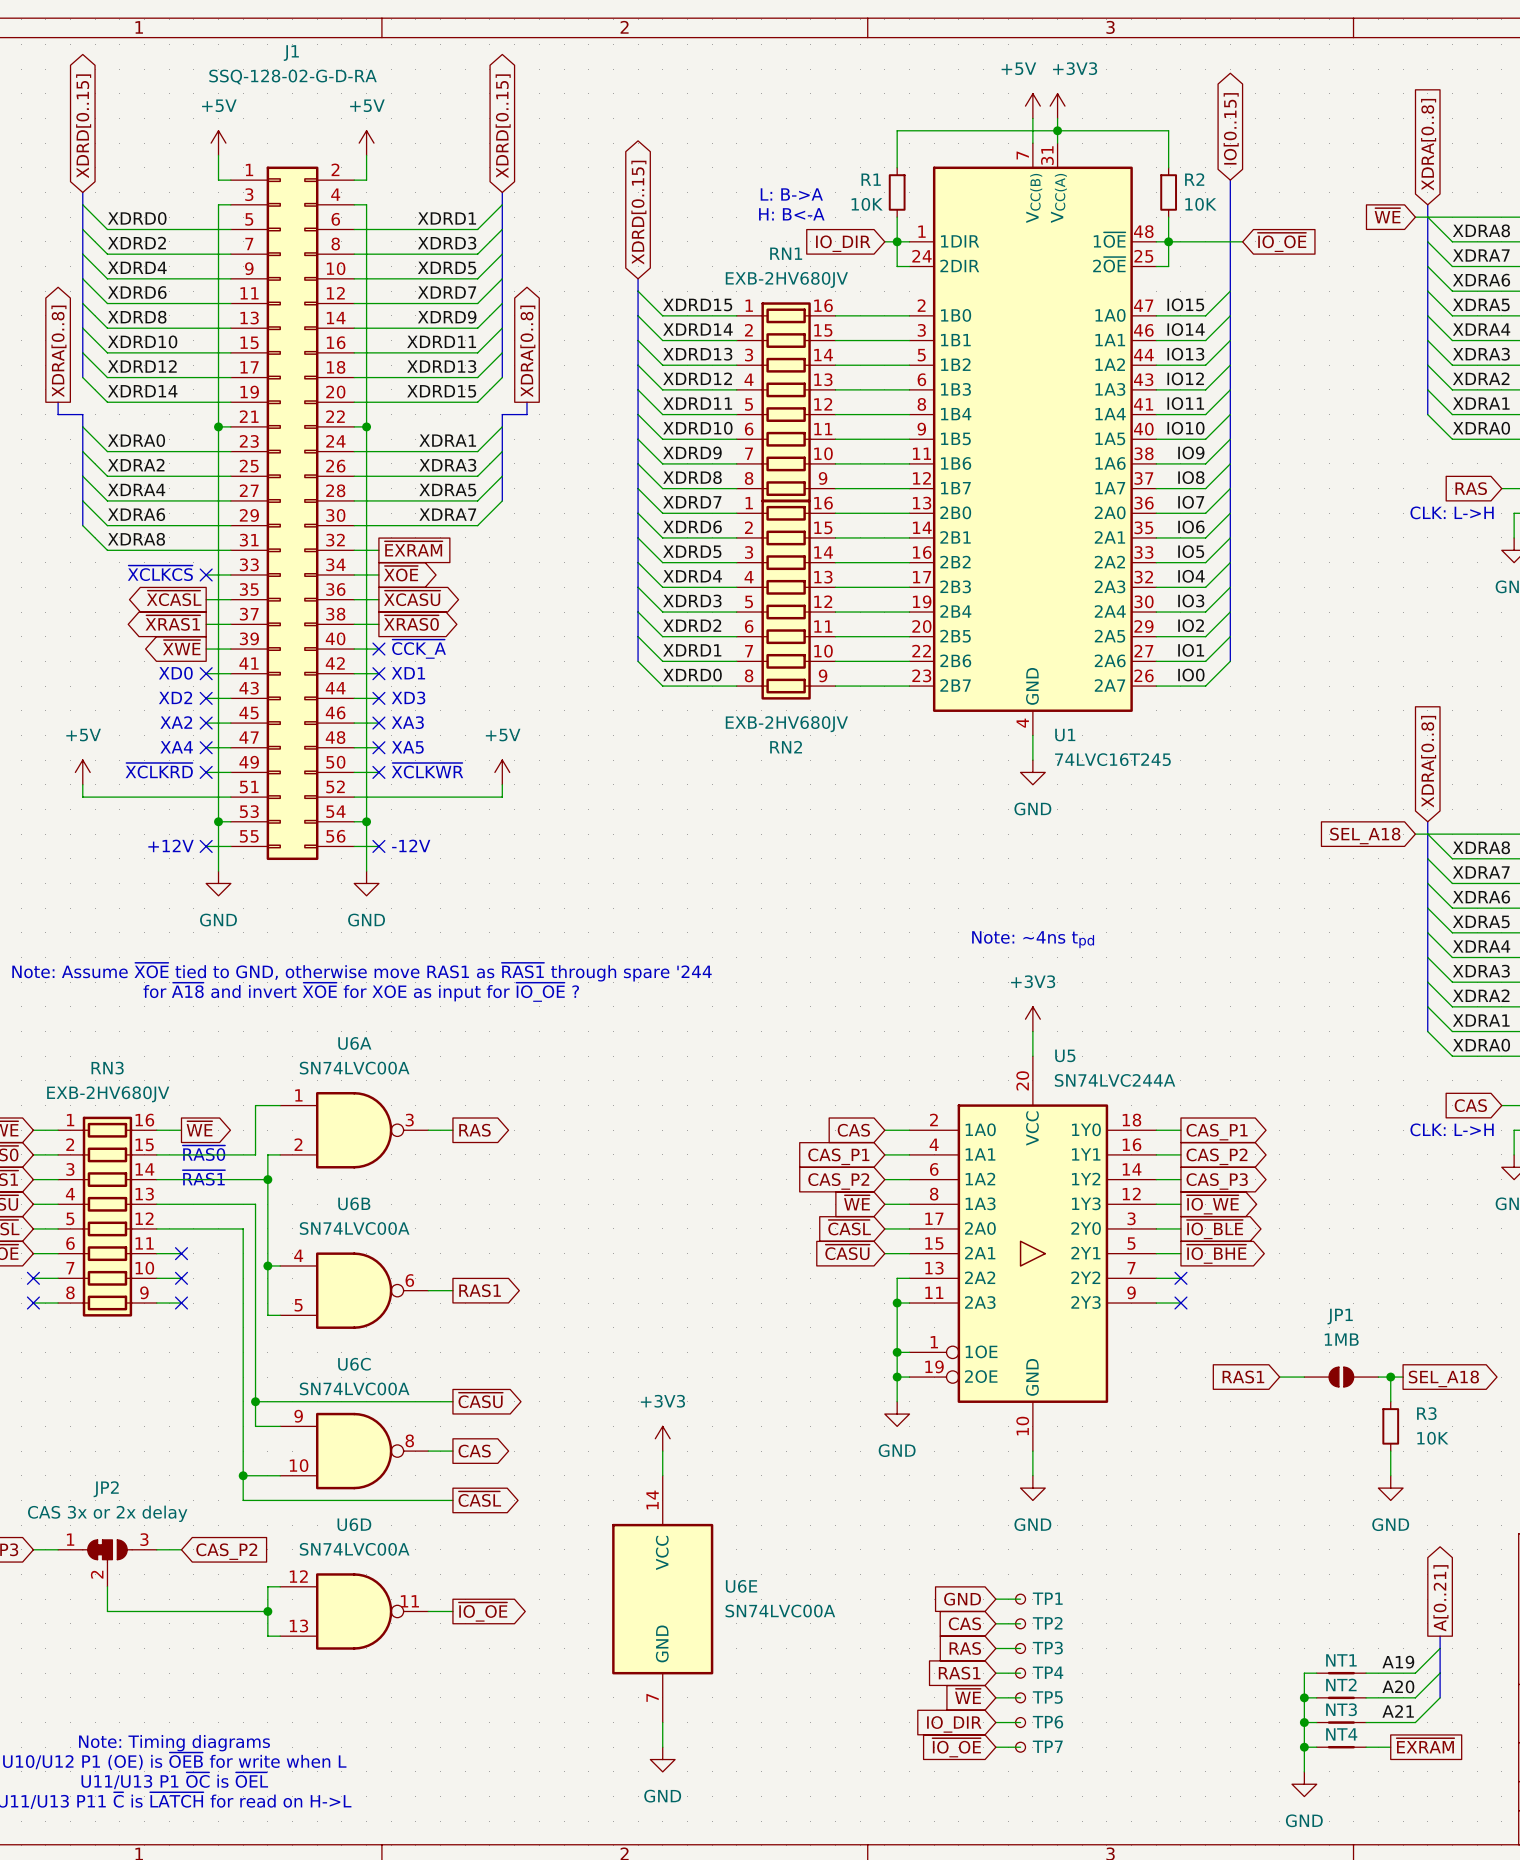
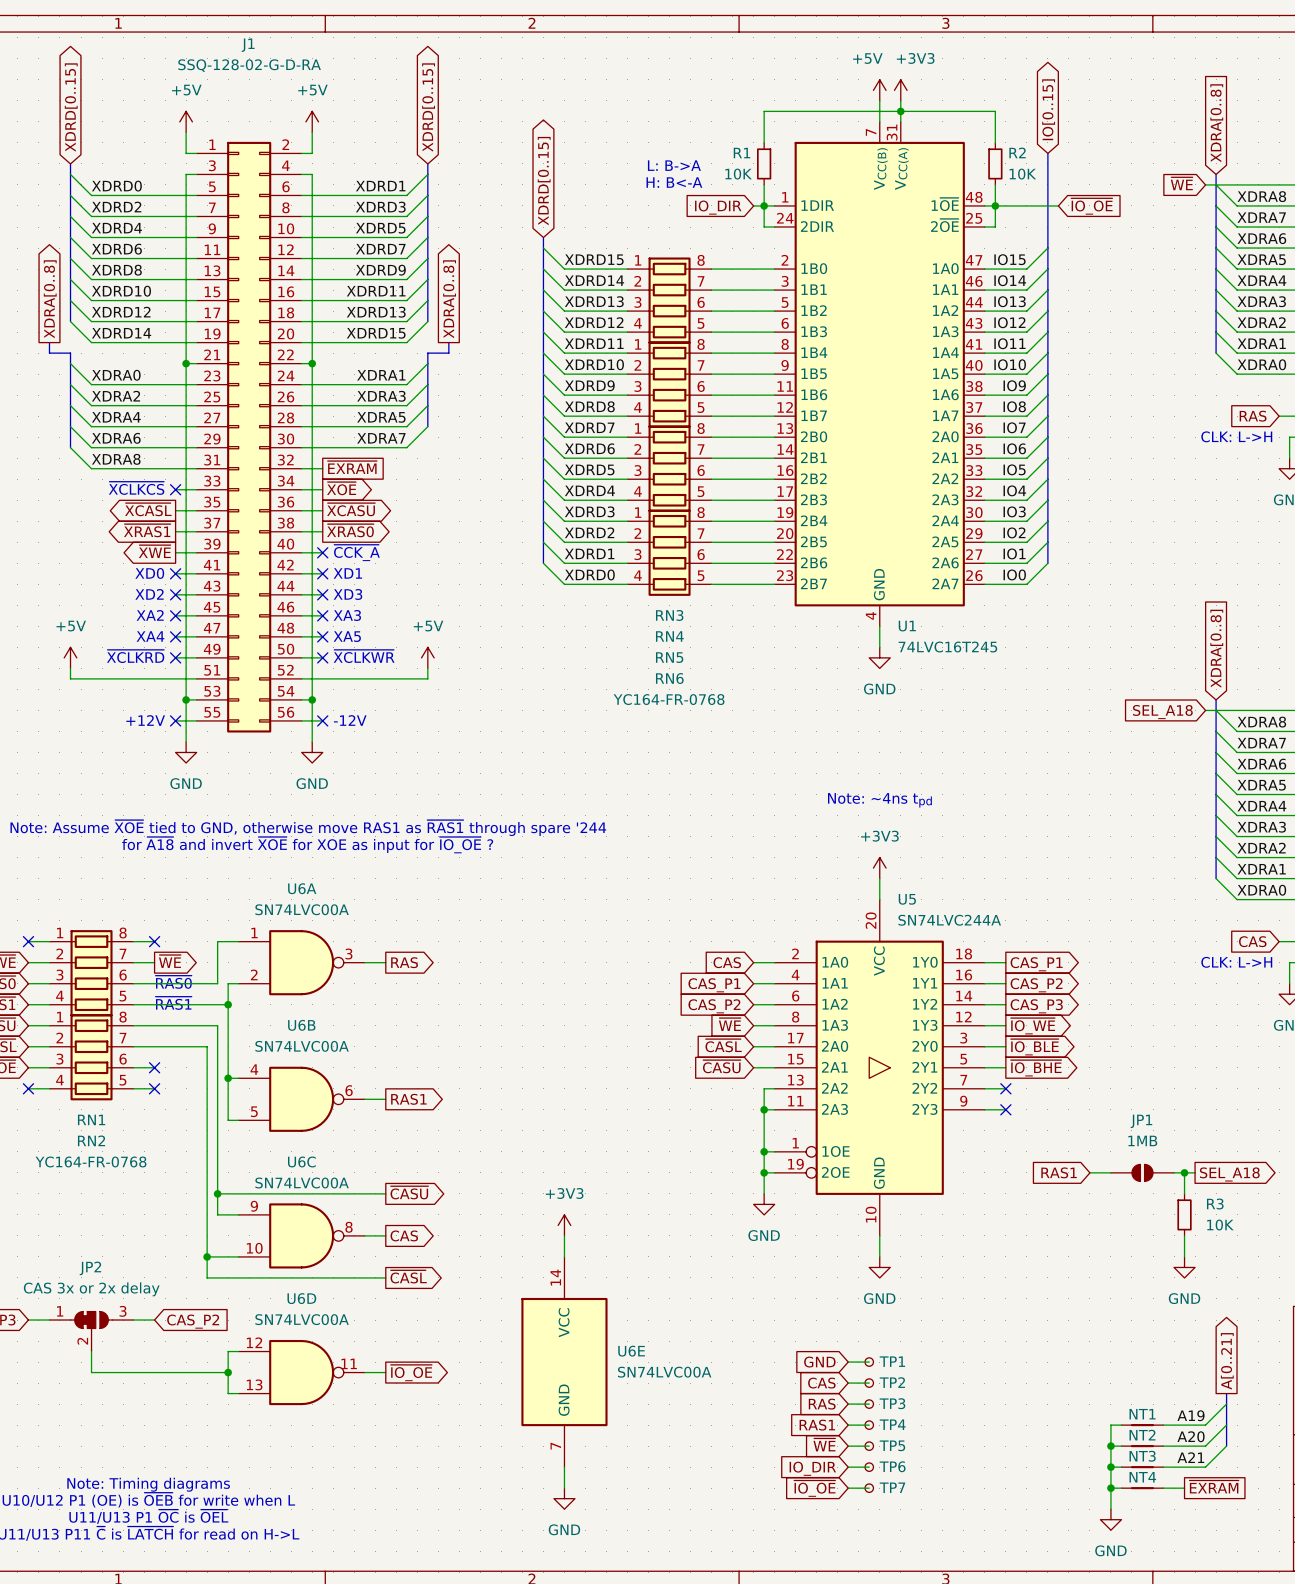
RN1 name position: RN1 (786, 253) -> RN1 (91, 1119)
RN1 value: EXB-2HV680JV (786, 279) -> none
RN1 symbol: [736, 302, 836, 503] -> [49, 930, 134, 1017]
RN4: none -> (669, 384)
RN2 symbol: [736, 499, 836, 700] -> [49, 1014, 134, 1101]
RN5: none -> (669, 468)
RN6: none -> (669, 552)
RN2 value: EXB-2HV680JV (786, 724) -> YC164-FR-0768 (91, 1161)
RN2 name position: RN2 (786, 747) -> RN2 (91, 1140)
RN3 name position: RN3 (107, 1068) -> RN3 (669, 615)
RN3 value: EXB-2HV680JV (108, 1094) -> YC164-FR-0768 (669, 699)
no-connect mark: none -> (28, 941)
no-connect mark: none -> (154, 941)
RN3 symbol: [58, 1116, 157, 1317] -> [627, 257, 712, 344]
wire: (33, 1303) (58, 1303) -> (28, 941) (49, 941)
no-connect mark: (33, 1303) -> none
wire: (156, 1303) (181, 1303) -> (133, 941) (154, 941)
no-connect mark: (181, 1303) -> none

